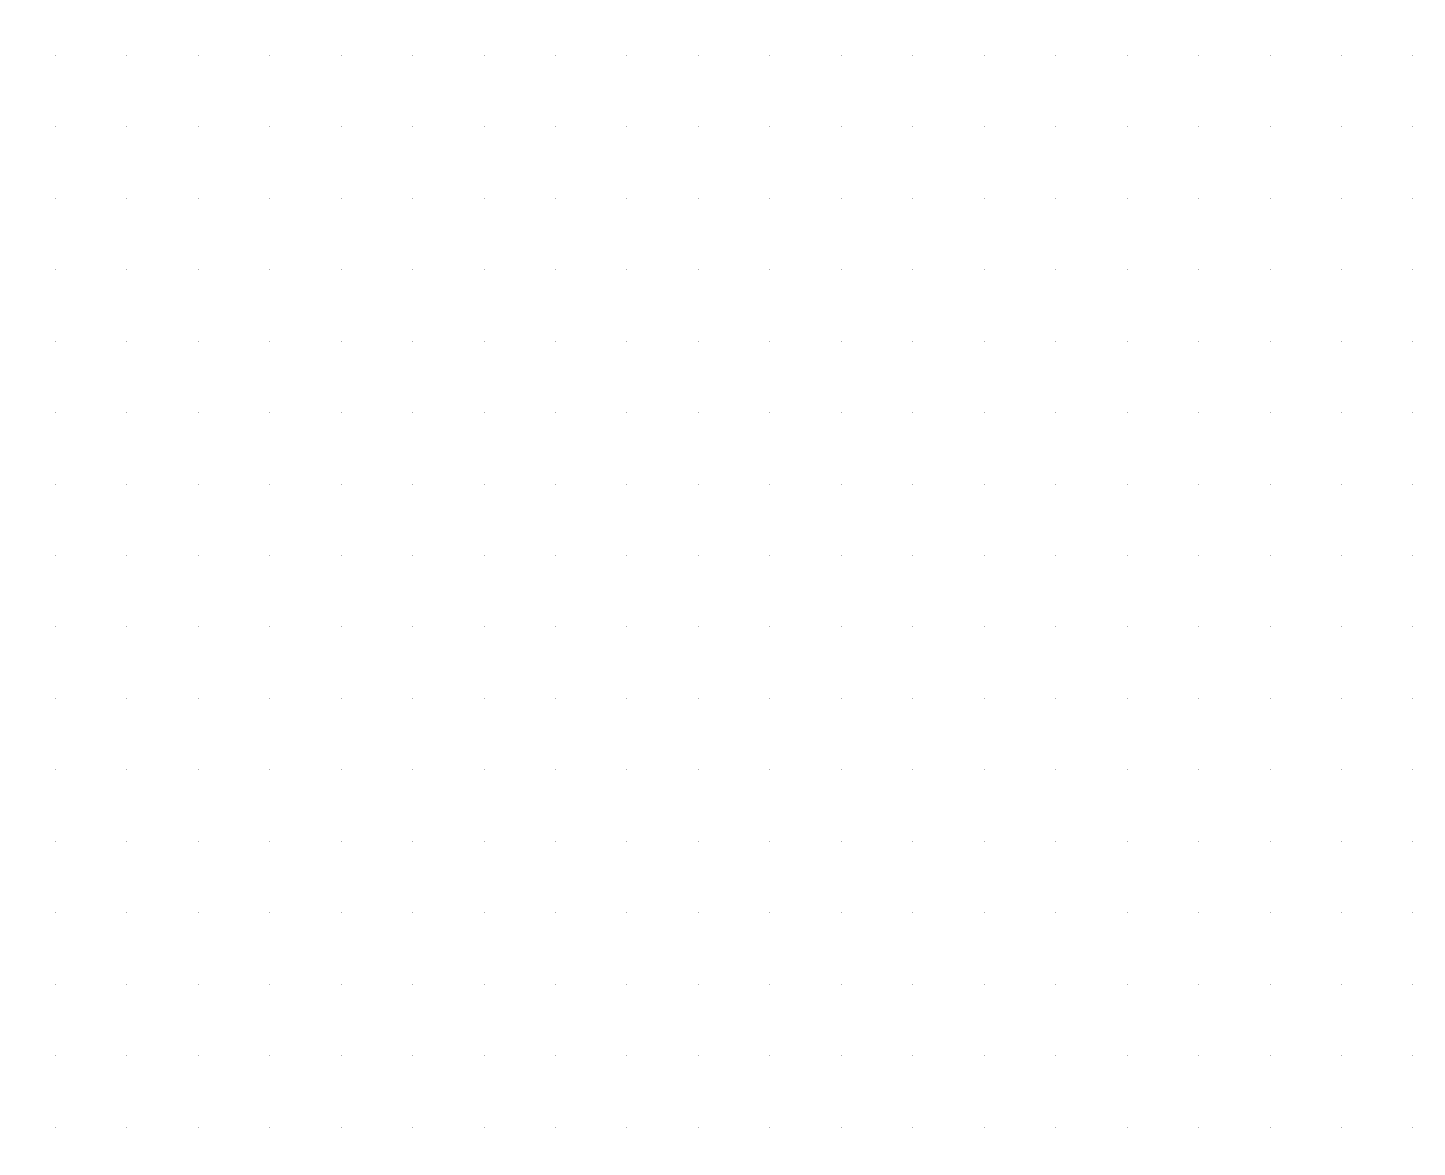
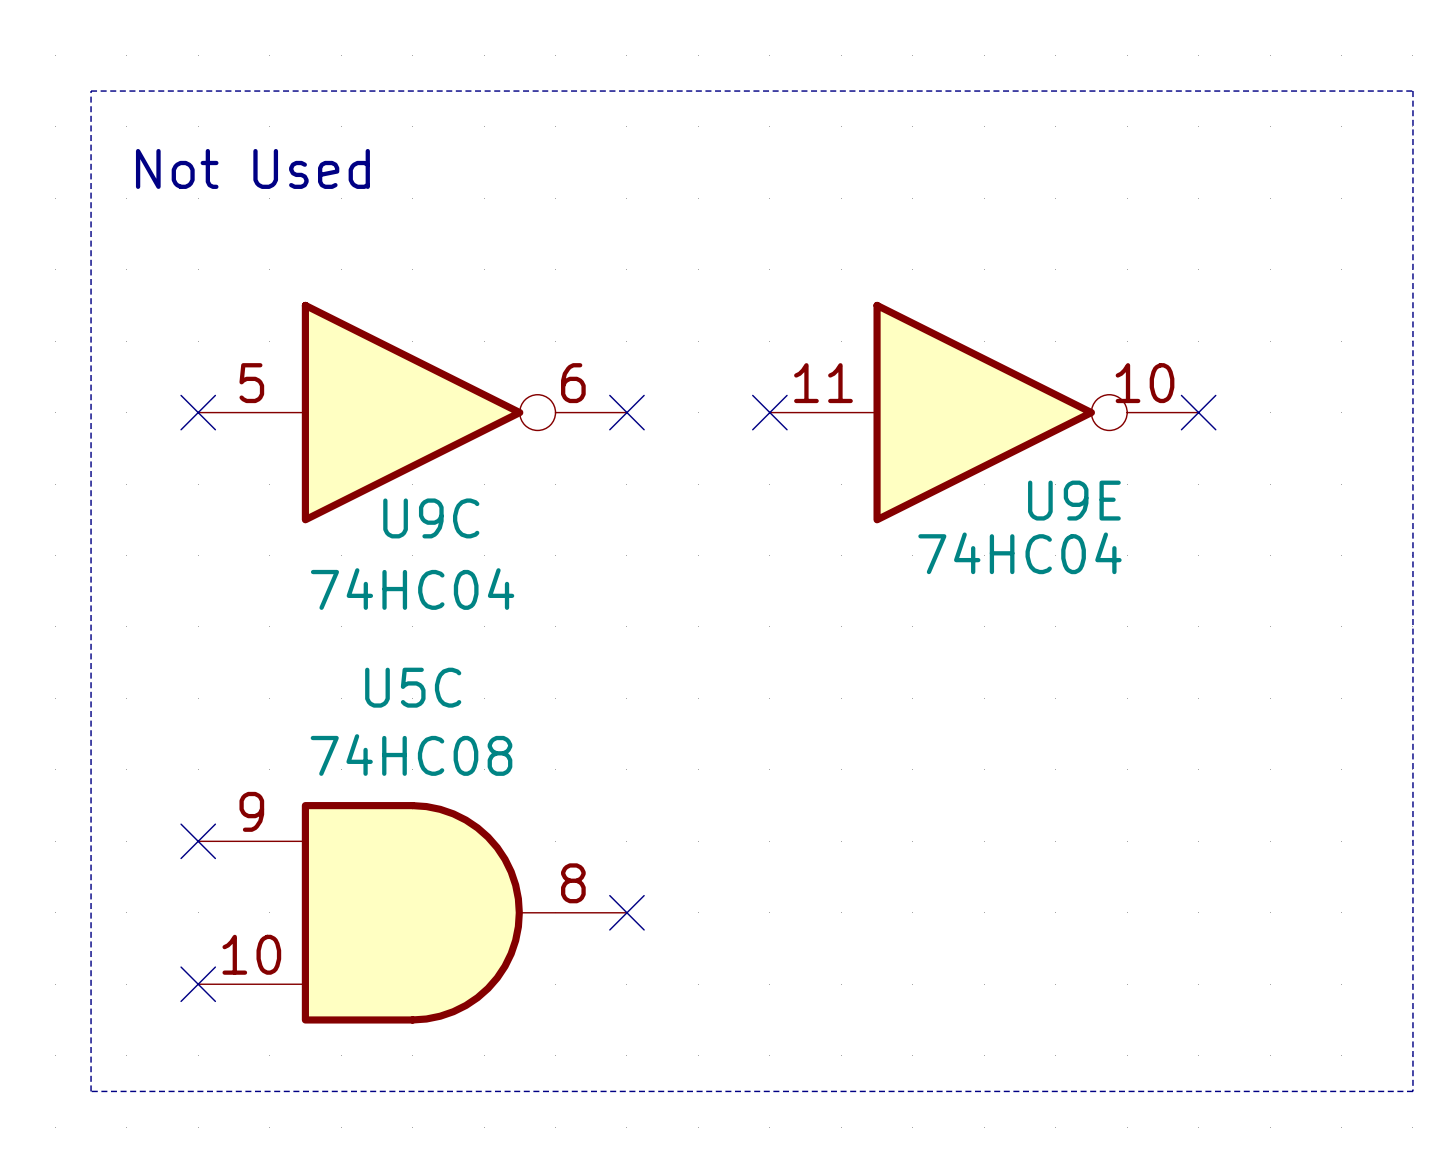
line: none -> (91, 91) (1412, 91) (1412, 1091) (91, 1091) (91, 91)
text: none -> Not Used (252, 168)
no-connect mark: none -> (198, 412)
U9C: none -> 74HC04 (412, 412)
no-connect mark: none -> (626, 412)
no-connect mark: none -> (769, 412)
U9E: none -> 74HC04 (984, 412)
no-connect mark: none -> (1198, 412)
no-connect mark: none -> (198, 841)
U5C: none -> 74HC08 (412, 912)
no-connect mark: none -> (626, 912)
no-connect mark: none -> (198, 984)

